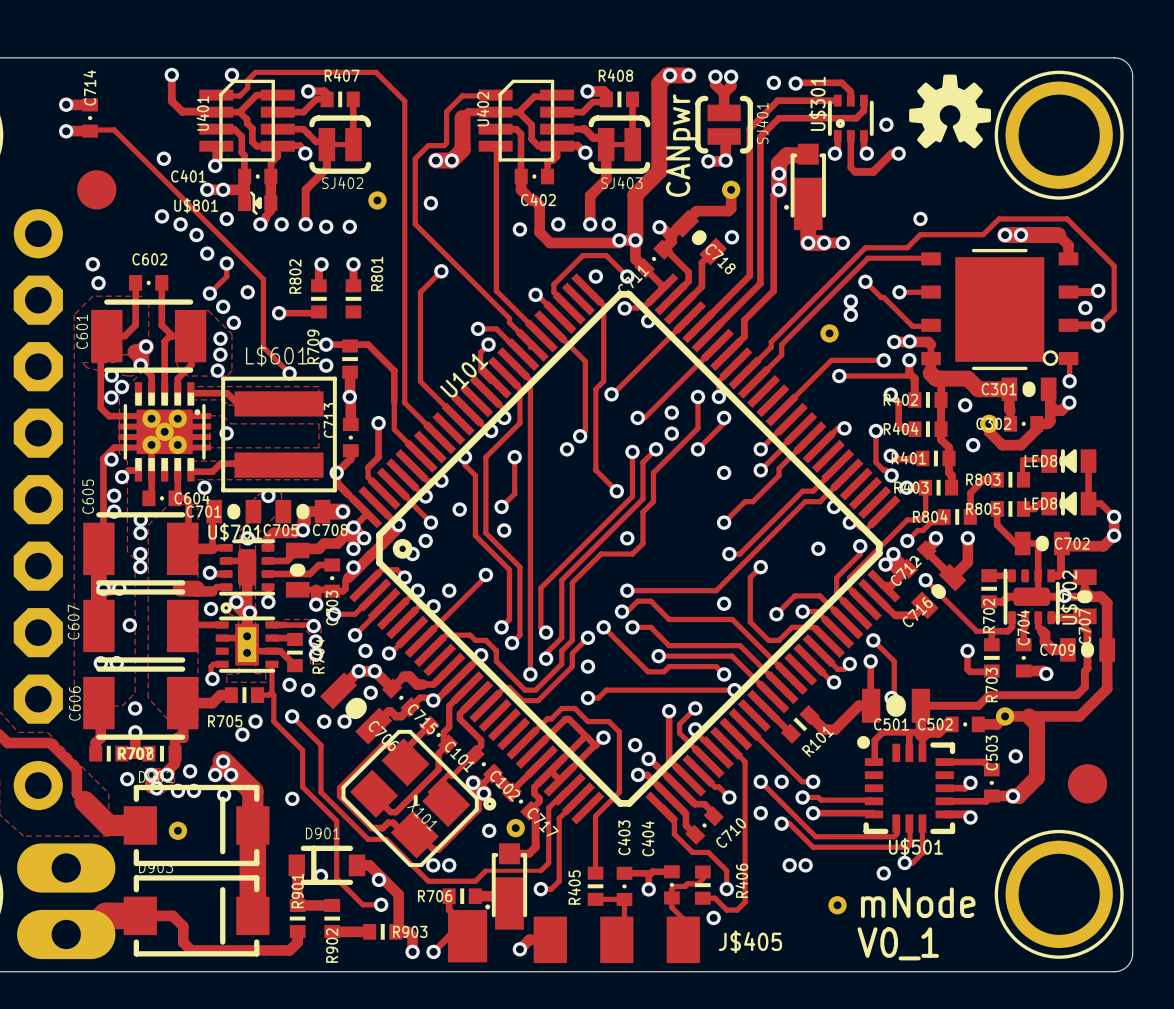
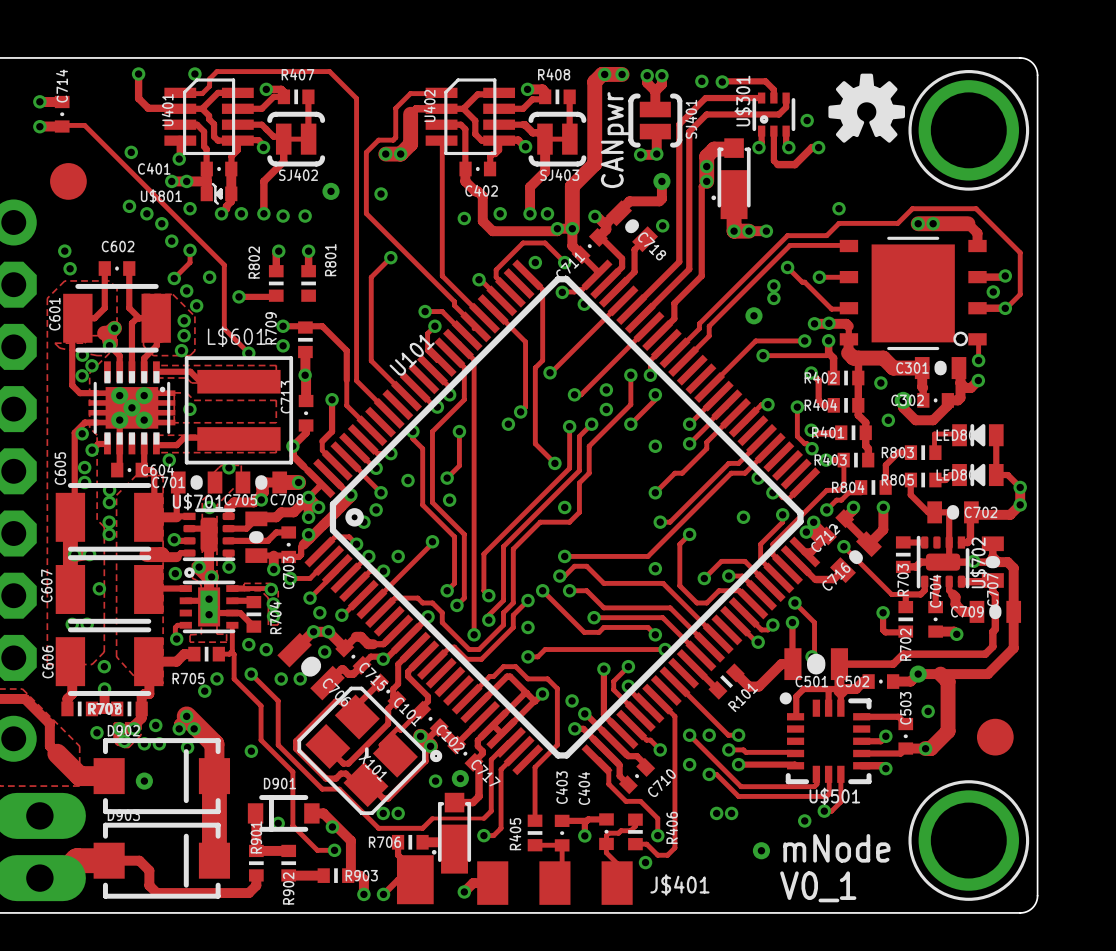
R702 name: R702 (989, 615) -> R703 (903, 580)
R703 name: R703 (991, 684) -> R702 (905, 644)
J$405 name: J$405 (750, 941) -> J$401 (679, 884)

